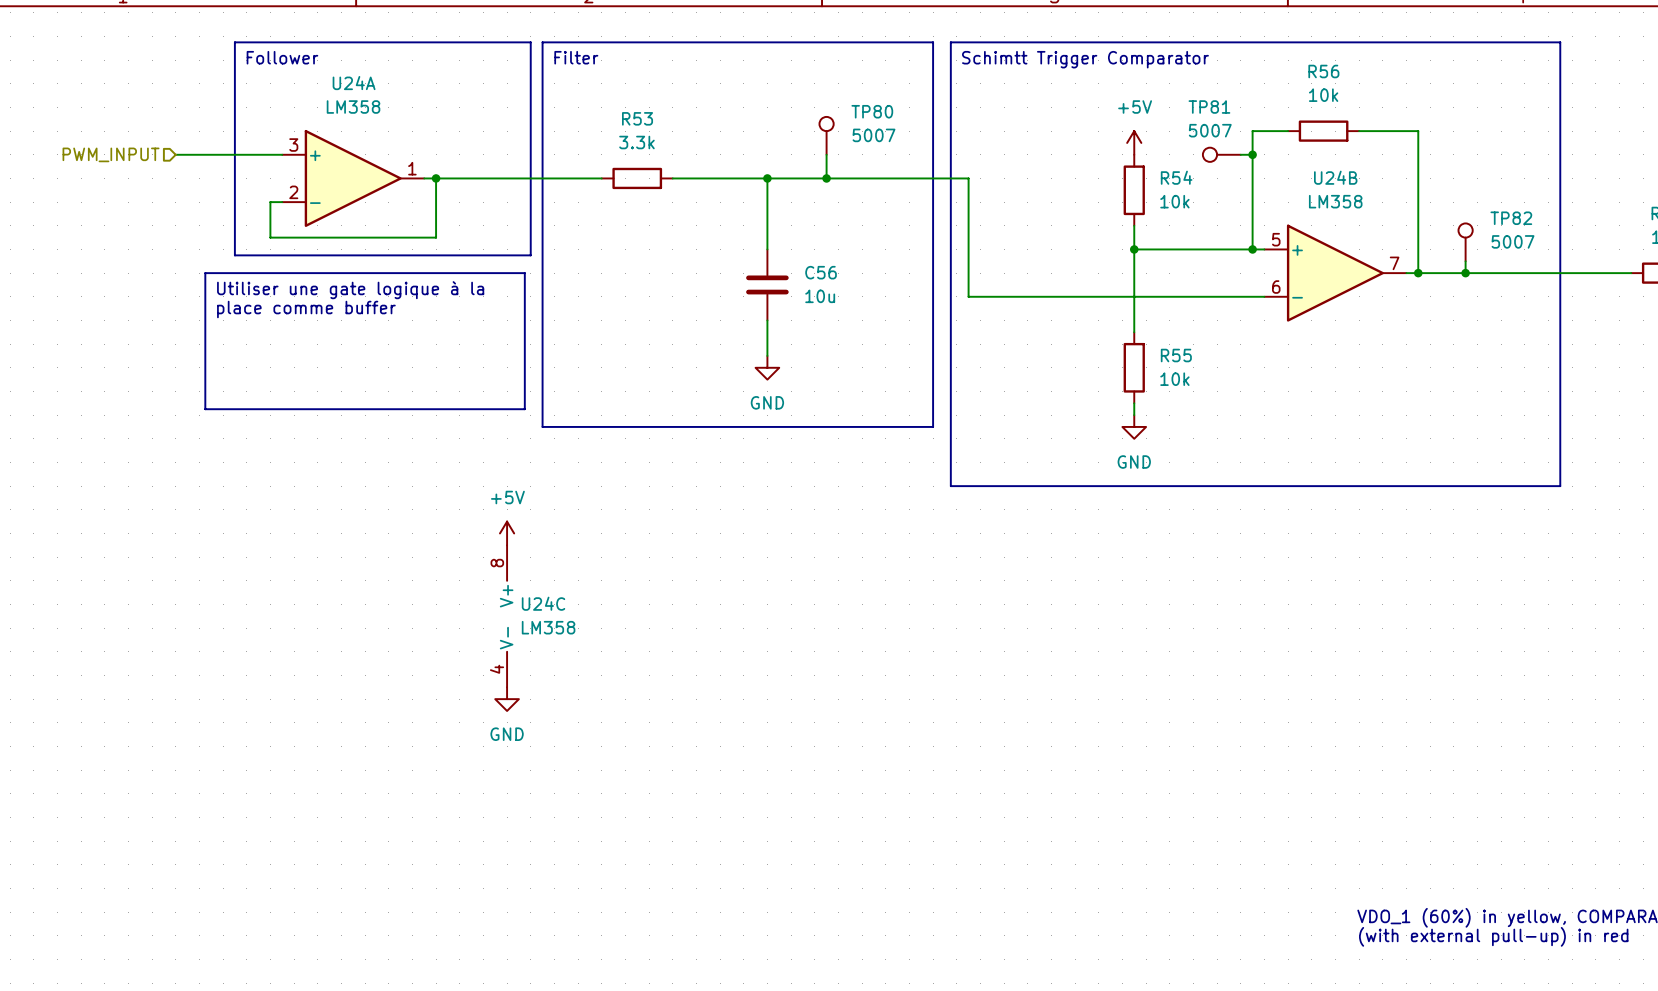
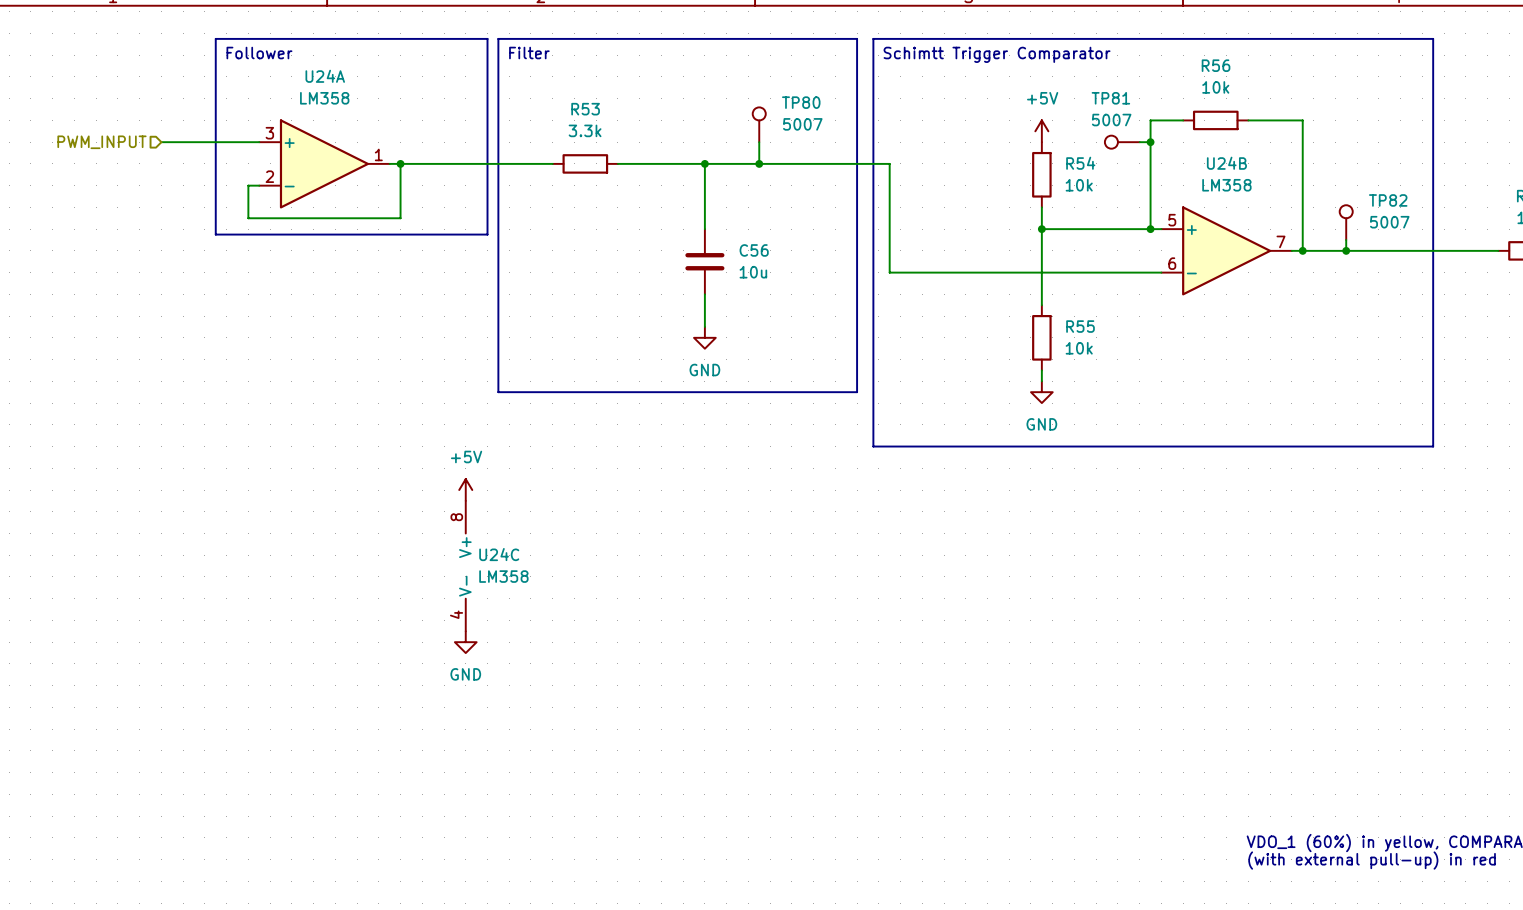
line: (205, 273) (524, 273) (524, 409) (205, 409) (205, 273) -> none
text: Utiliser une gate logique à la (350, 290) -> none
text: place comme buffer (306, 309) -> none

